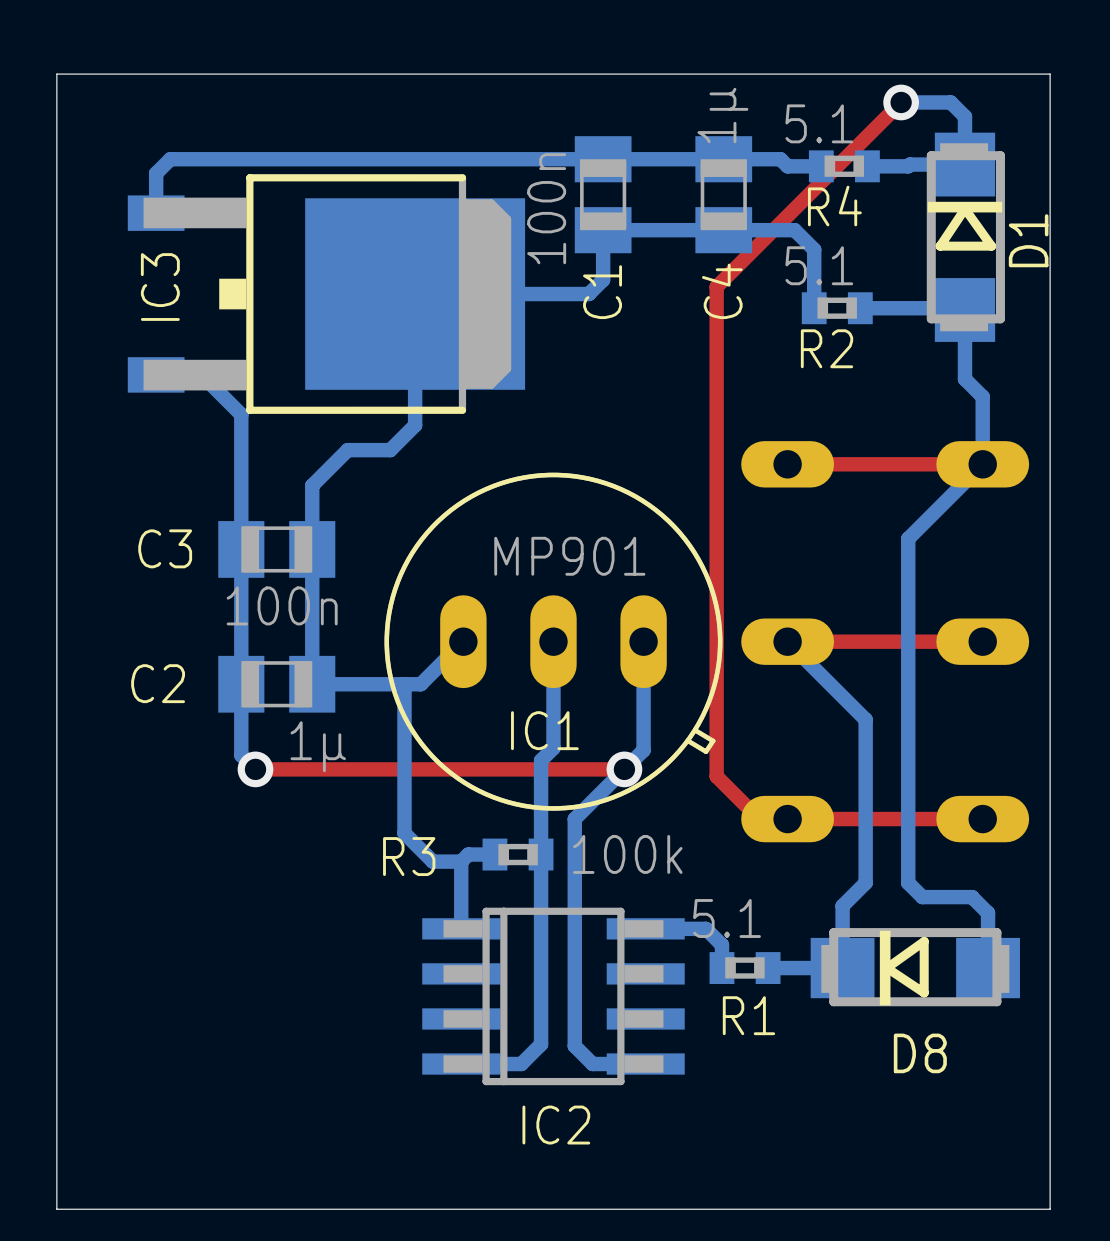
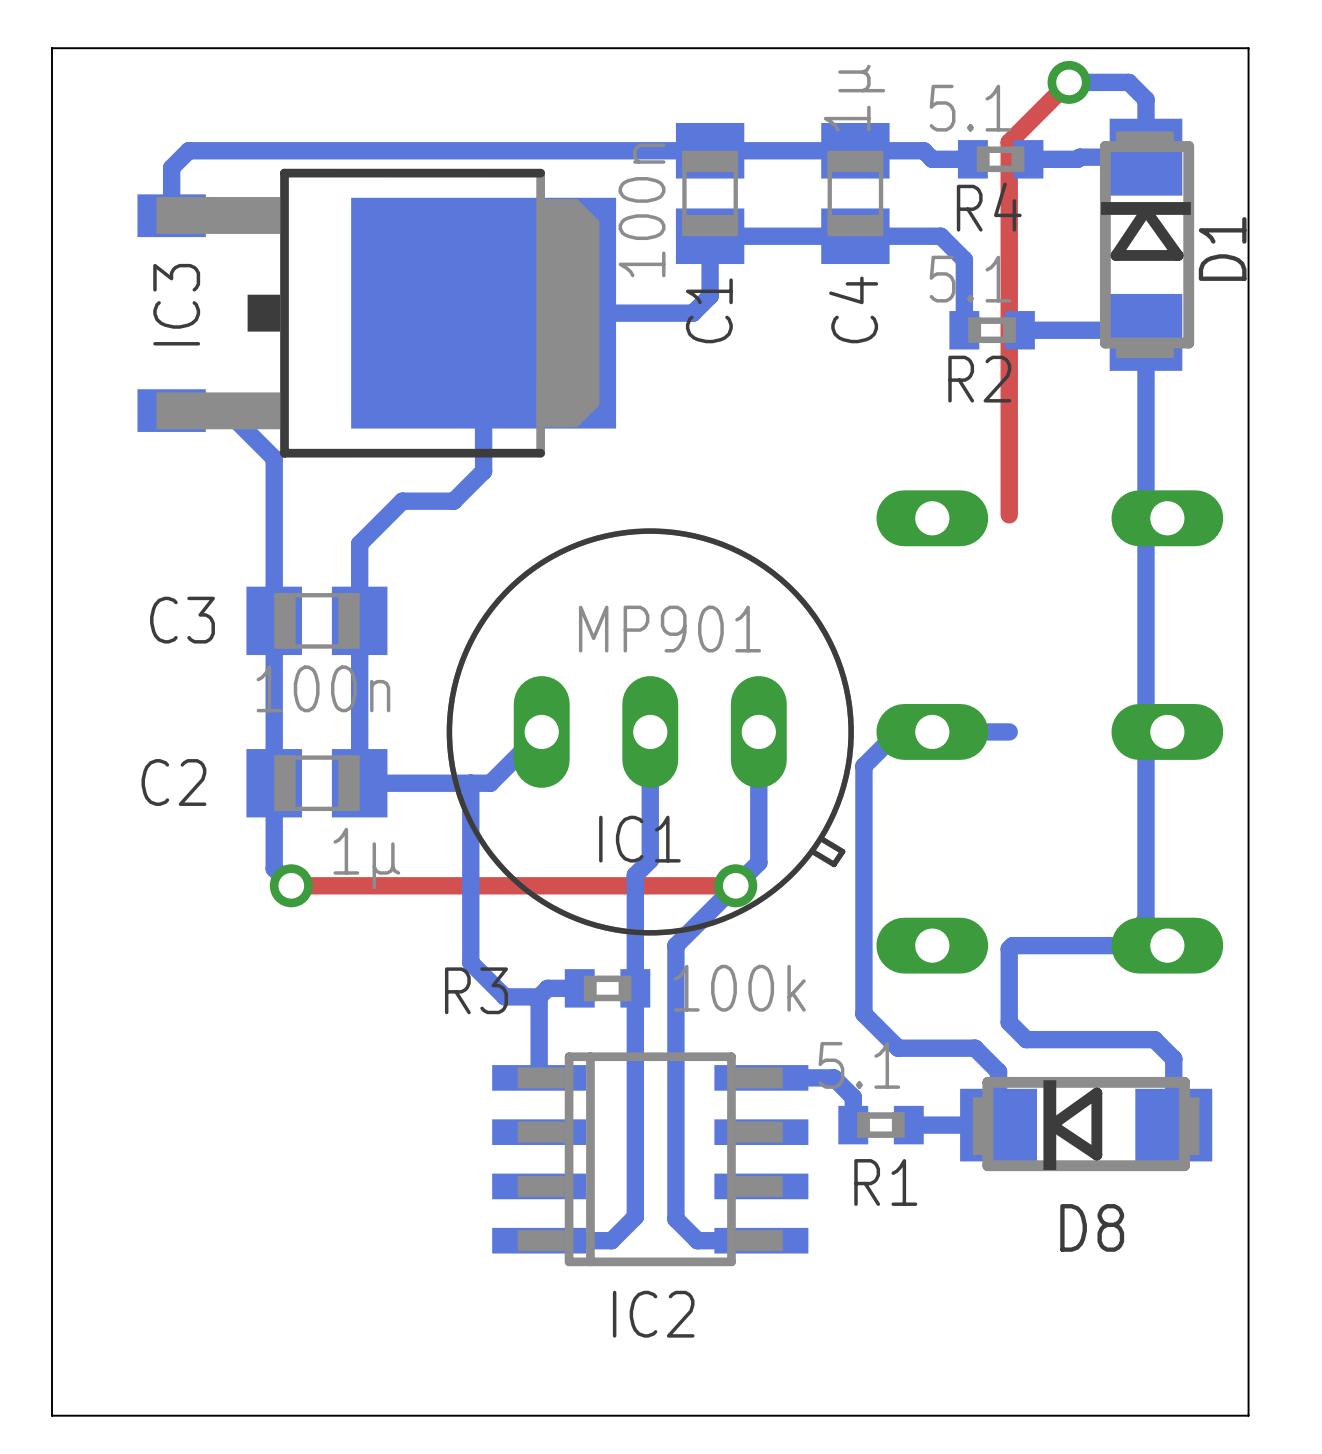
top track: (851, 152) (716, 286) (716, 776) (759, 819) (982, 819) -> (1009, 142) (1009, 514)
bottom track: (964, 379) (982, 396) (982, 464) (908, 538) (908, 882) (922, 897) -> (1145, 415) (1145, 919) (1120, 945) (1012, 945) (1009, 949) (1009, 1022) (1026, 1039) (1094, 1039)
top track: (982, 464) (787, 464) -> none
bottom track: (787, 641) (865, 719) (865, 882) (842, 905) (842, 923) -> (1009, 731) (898, 731) (863, 766) (863, 1014) (898, 1048) (975, 1048) (998, 1071)
top track: (982, 641) (787, 641) -> none

